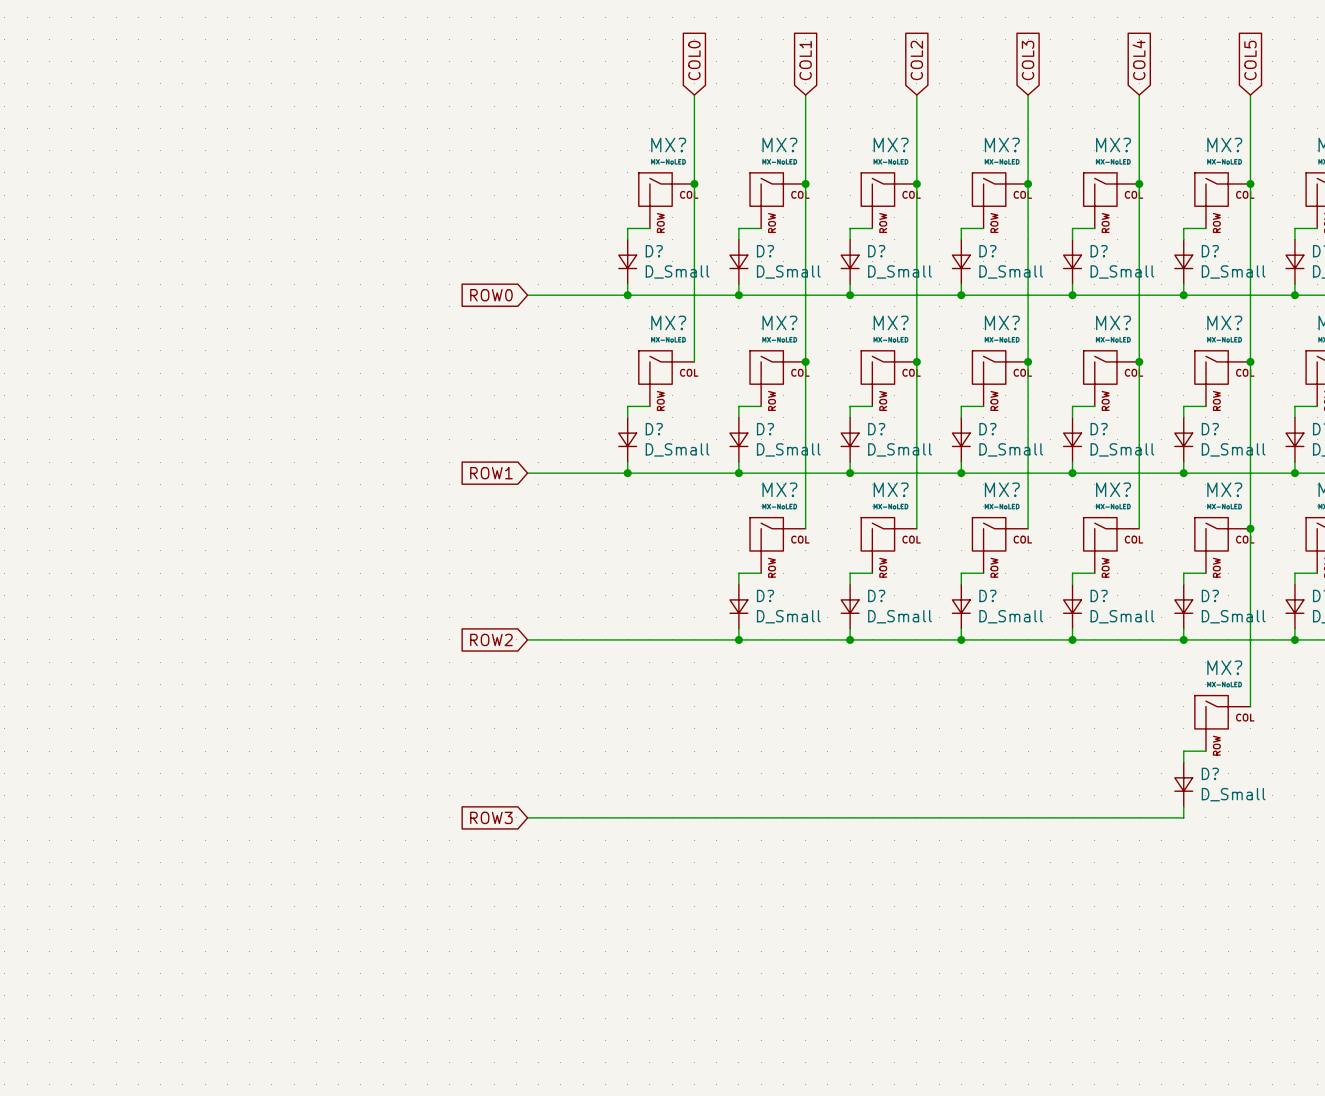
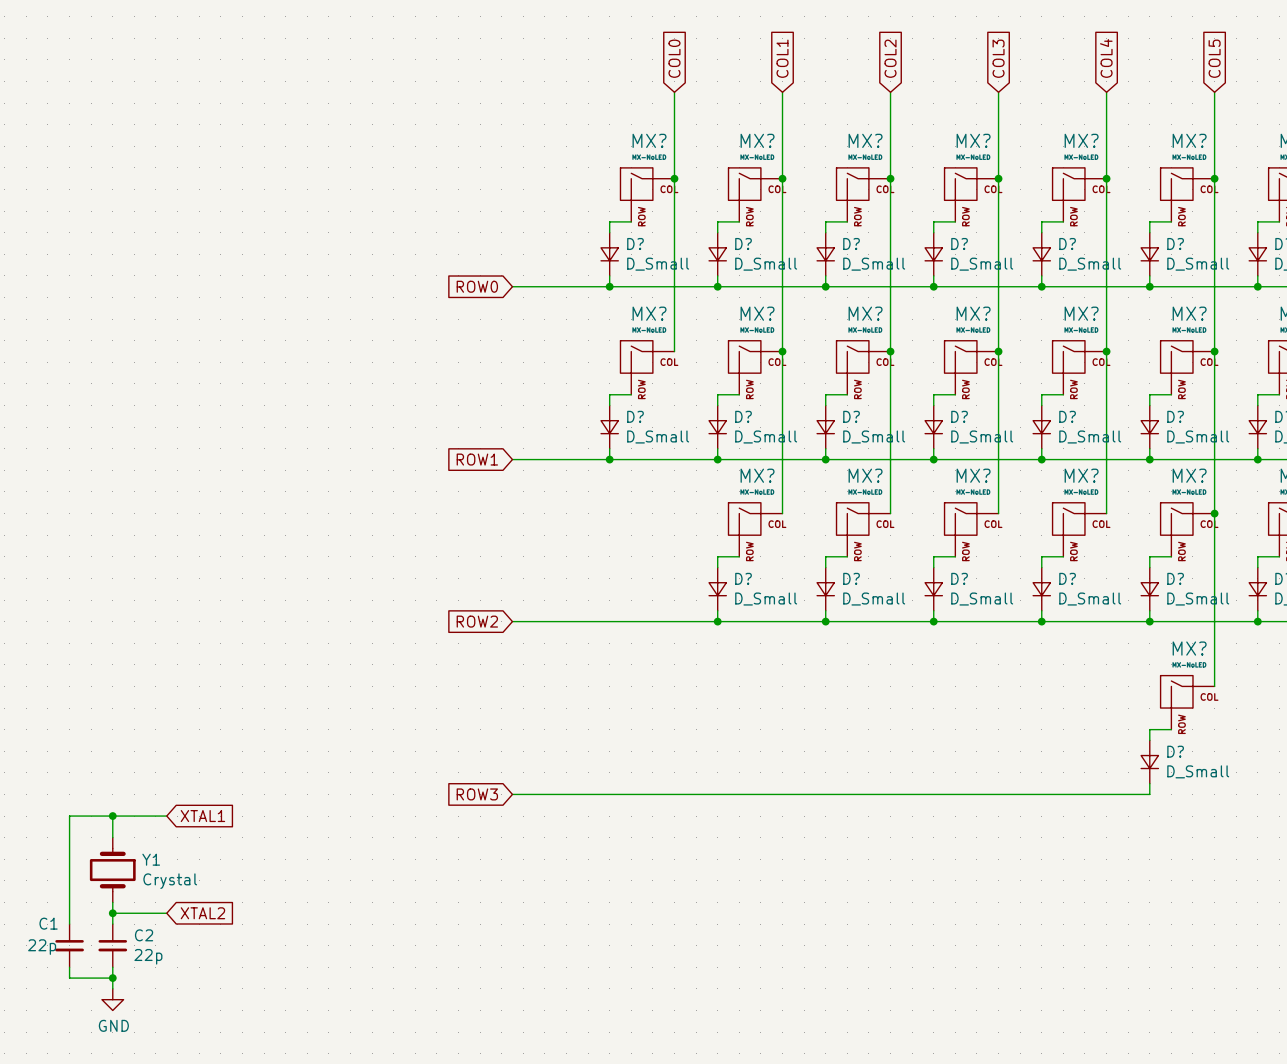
wire: none -> (112, 816) (112, 837)
junction: none -> (112, 816)
wire: none -> (166, 816) (69, 816) (69, 924)
global label: none -> XTAL1 (202, 816)
Y1: none -> Crystal (112, 870)
wire: none -> (112, 902) (112, 924)
wire: none -> (112, 913) (166, 913)
junction: none -> (112, 913)
global label: none -> XTAL2 (202, 913)
C1: none -> 22p (69, 945)
C2: none -> 22p (112, 945)
wire: none -> (69, 967) (69, 978) (112, 978)
wire: none -> (112, 967) (112, 988)
junction: none -> (112, 978)
power symbol: none -> GND (112, 999)

